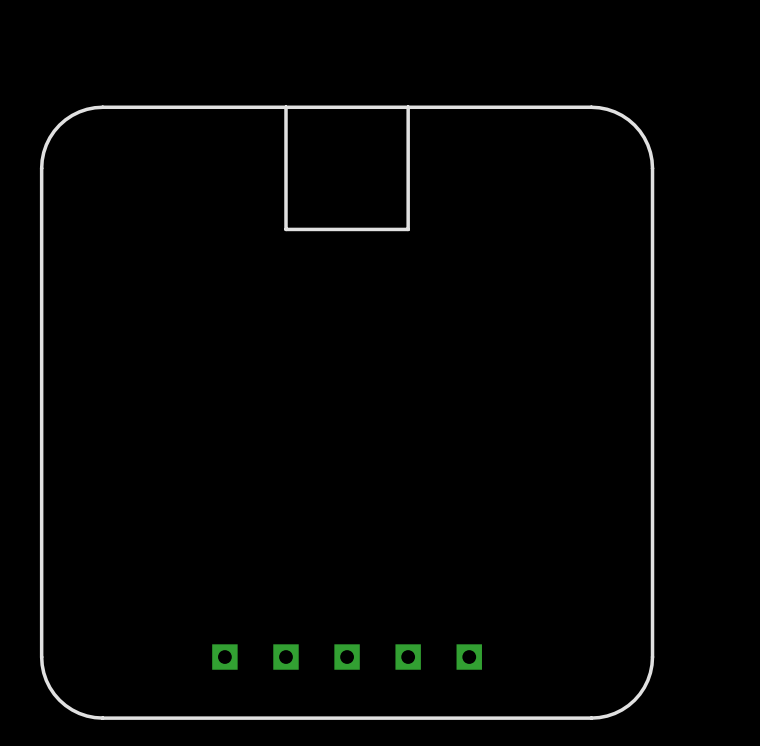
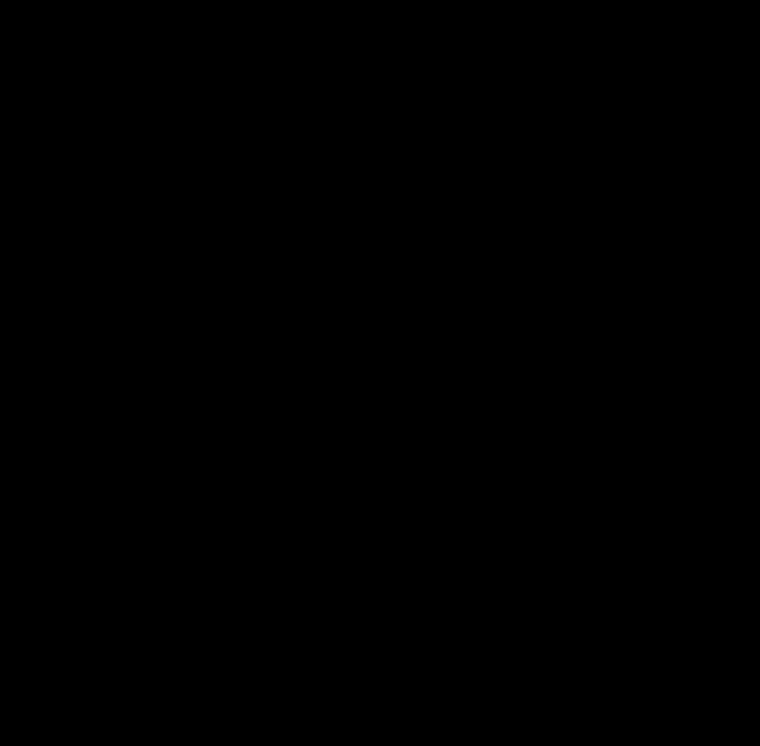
part: (347, 412) -> none

